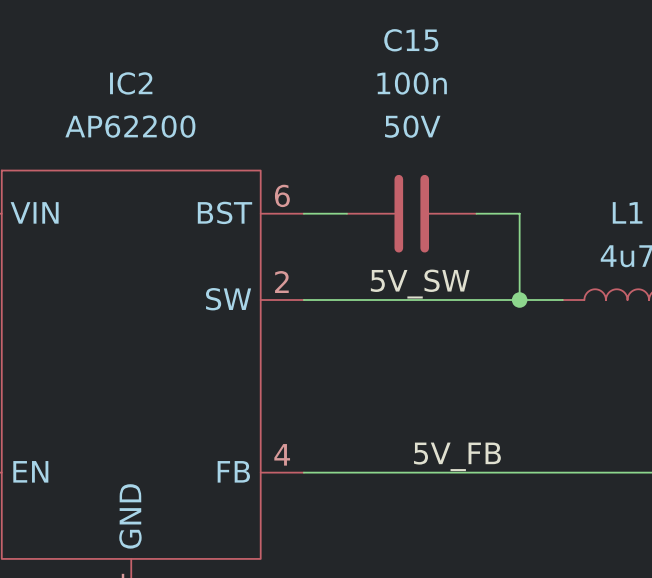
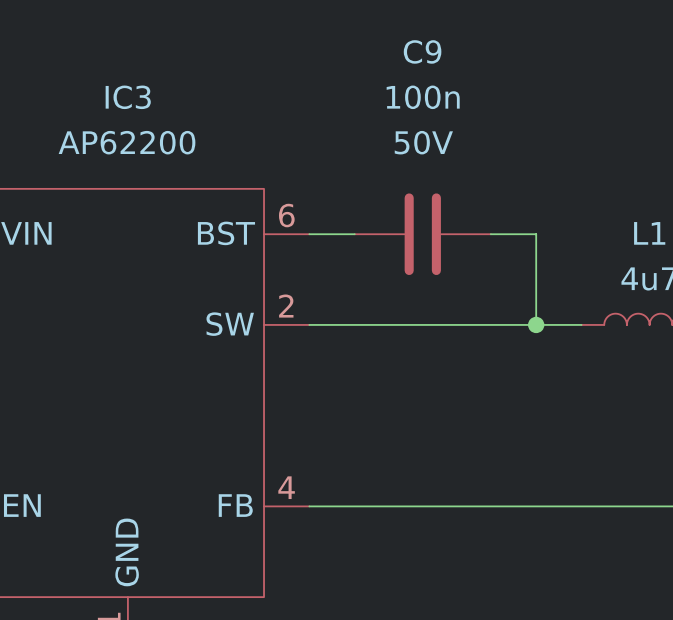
C15 name: C15 (411, 40) -> C9 (422, 51)
IC2 name: IC2 (131, 83) -> IC3 (128, 97)
label: 5V_SW (420, 284) -> none
label: 5V_FB (457, 456) -> none

